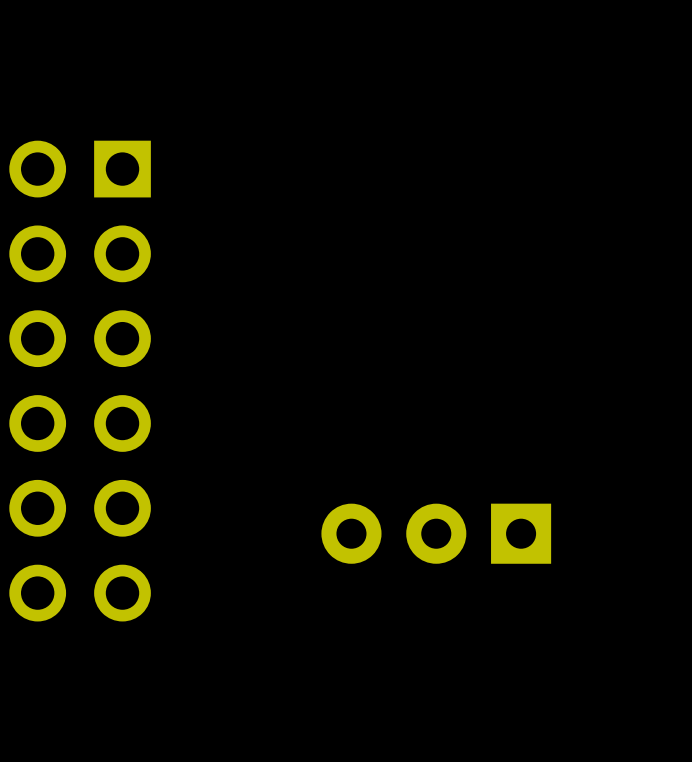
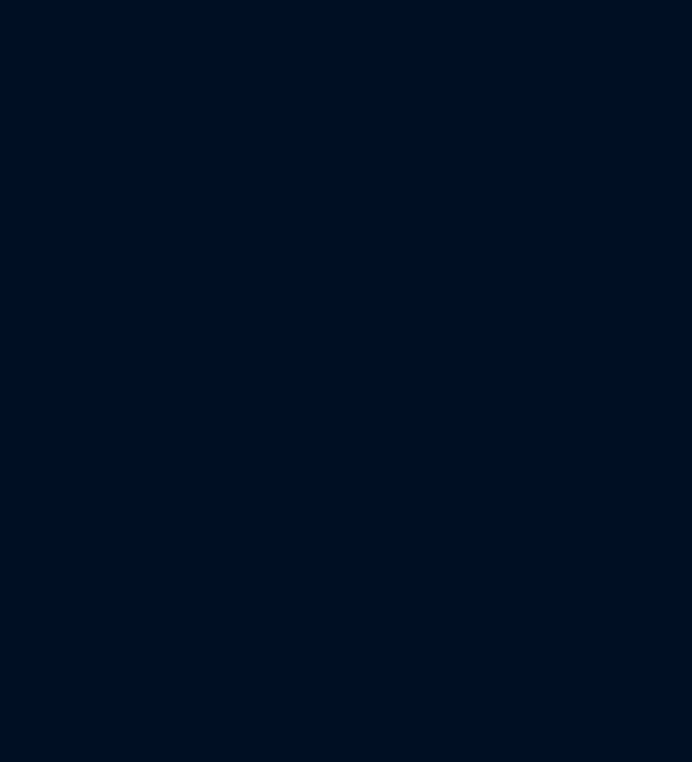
part: (80, 381) -> none
part: (436, 533) -> none

